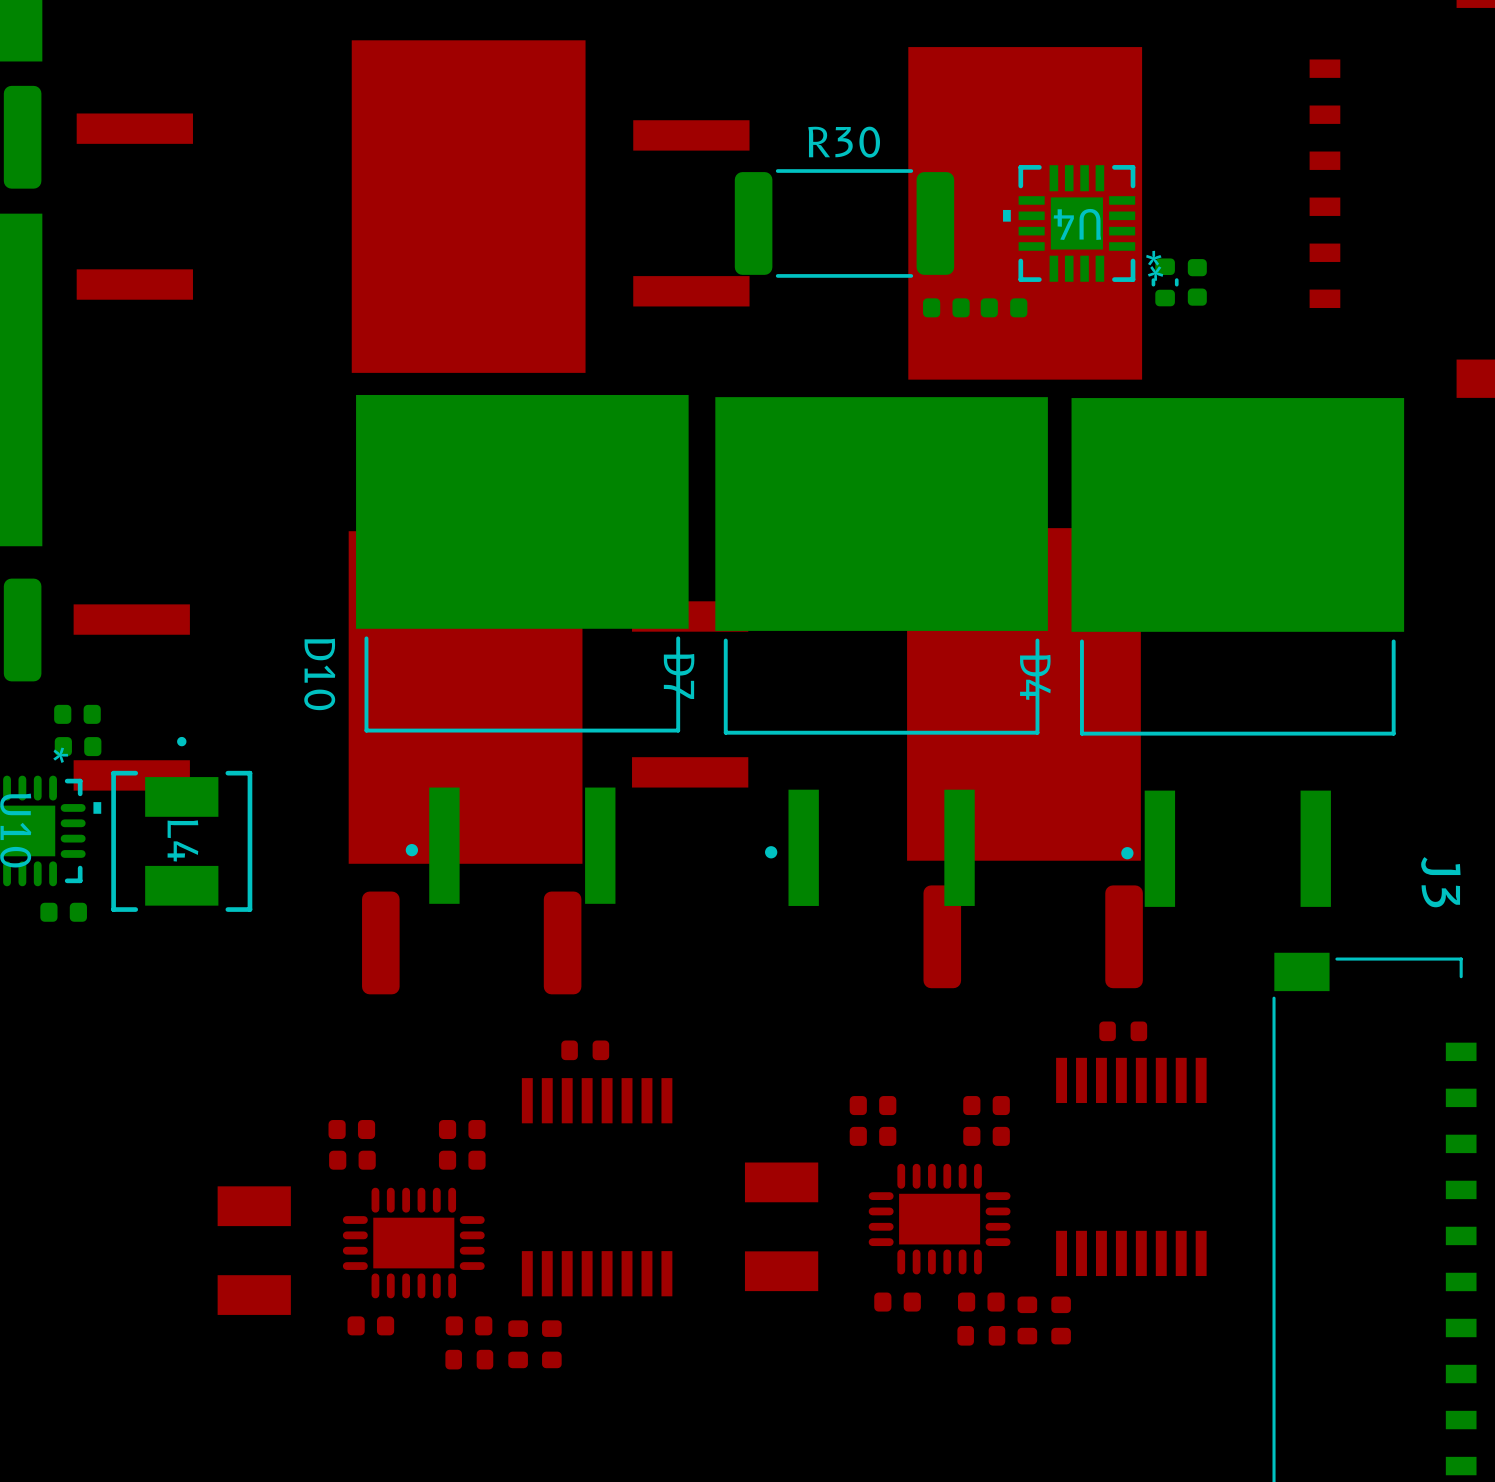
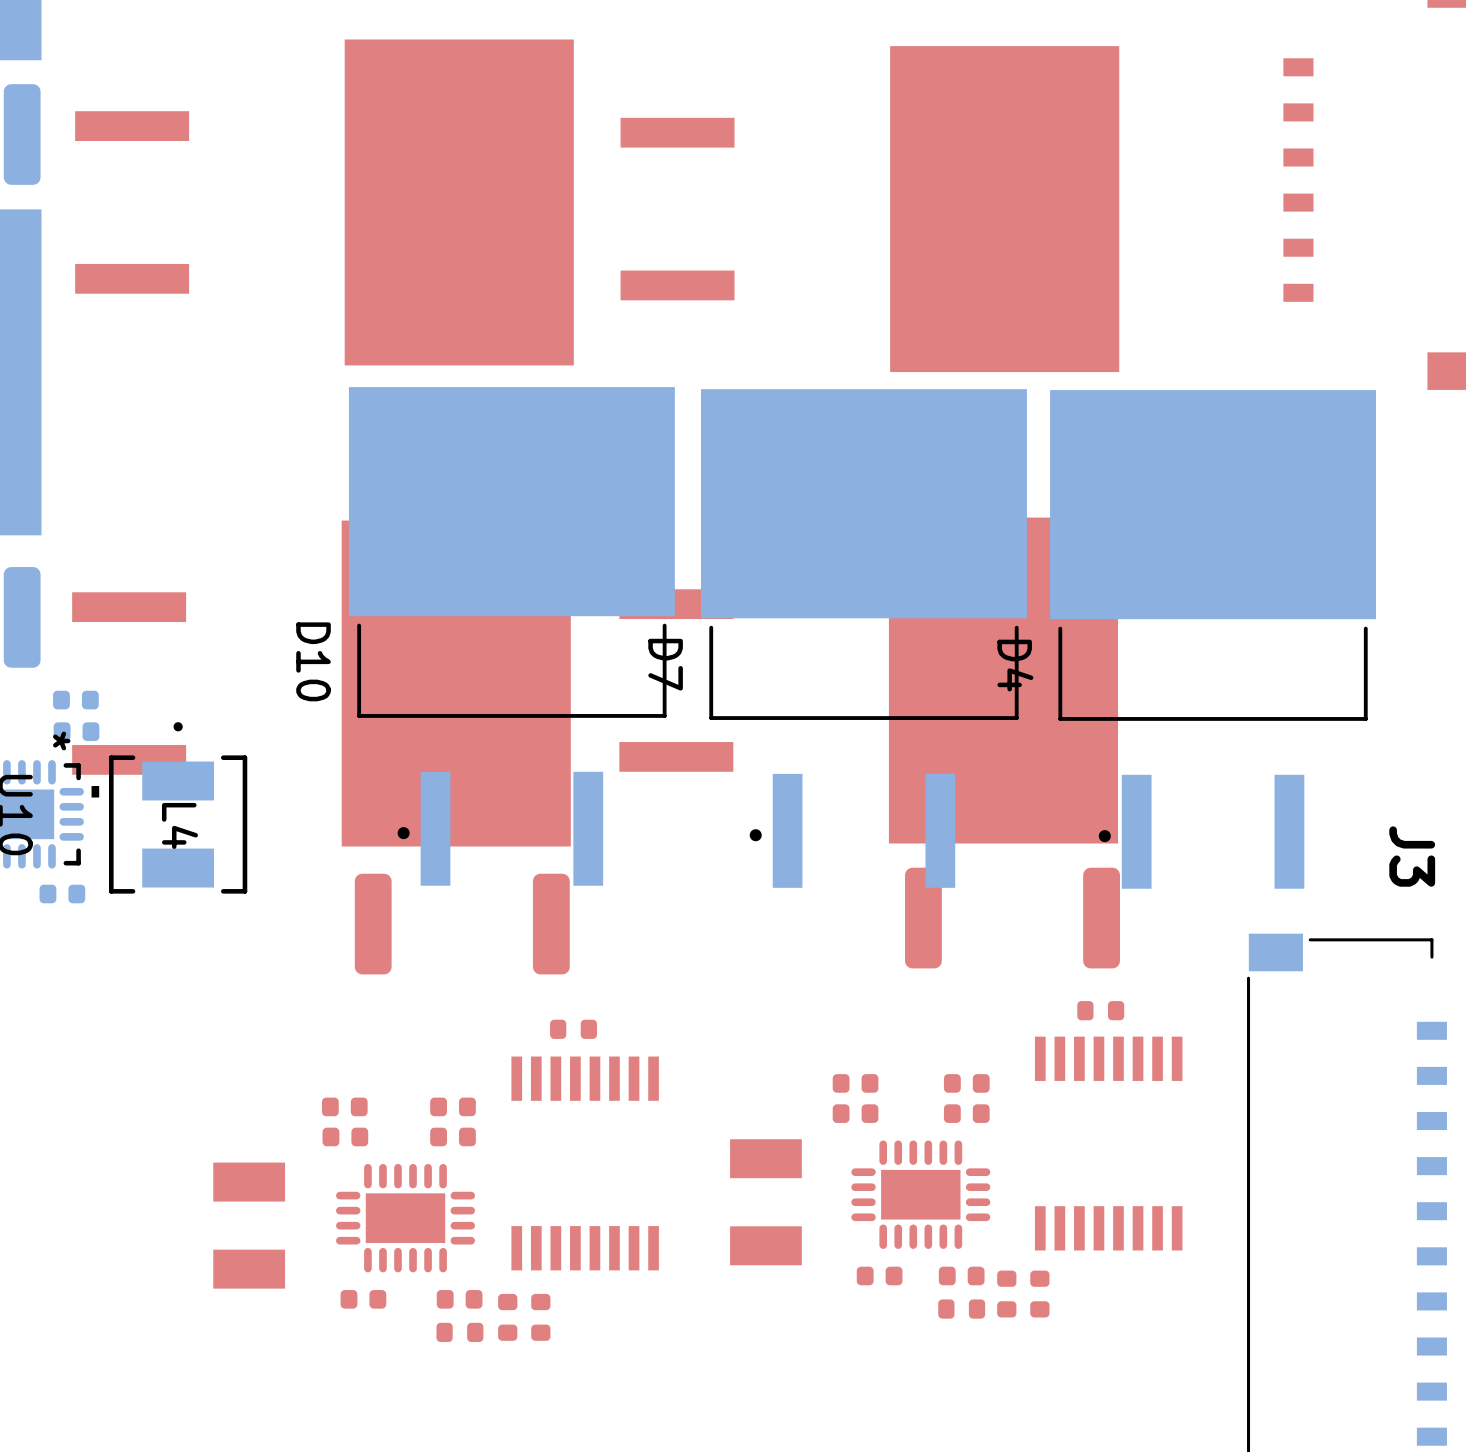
R30: (844, 223) -> none
U4: (1069, 223) -> none
part: (1165, 282) -> none
part: (1197, 282) -> none
part: (946, 307) -> none
part: (1004, 307) -> none

